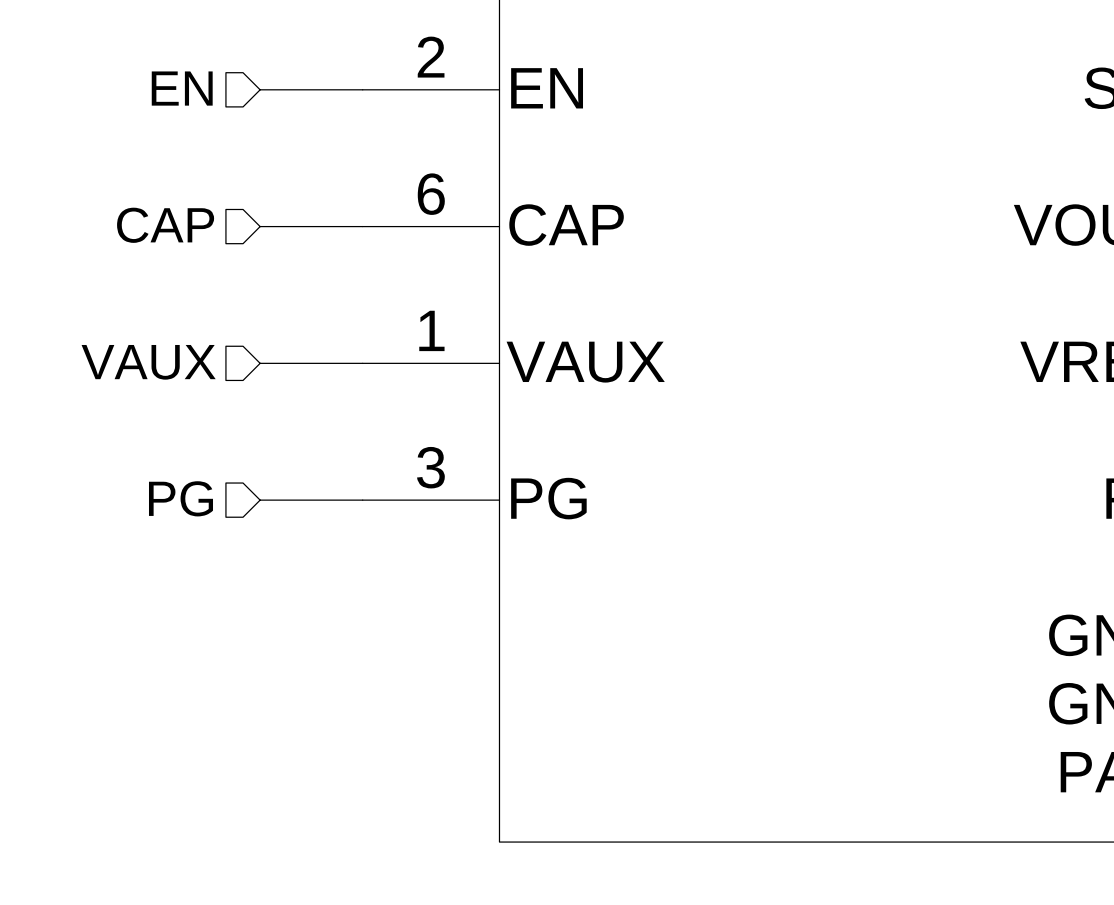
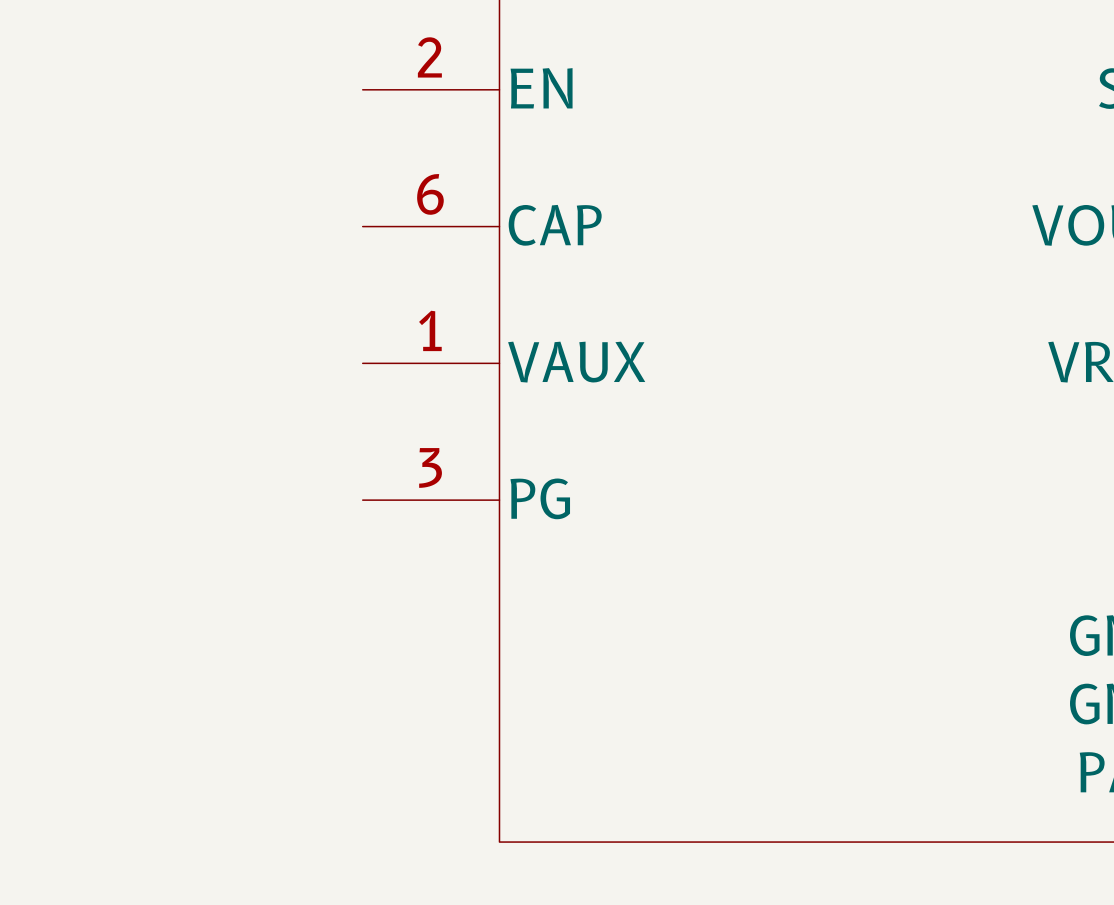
hierarchical label: EN (182, 88) -> none
wire: (260, 89) (362, 89) -> none
hierarchical label: CAP (165, 225) -> none
wire: (260, 226) (362, 226) -> none
hierarchical label: VAUX (148, 362) -> none
wire: (260, 363) (362, 363) -> none
hierarchical label: PG (180, 498) -> none
wire: (260, 500) (362, 500) -> none

